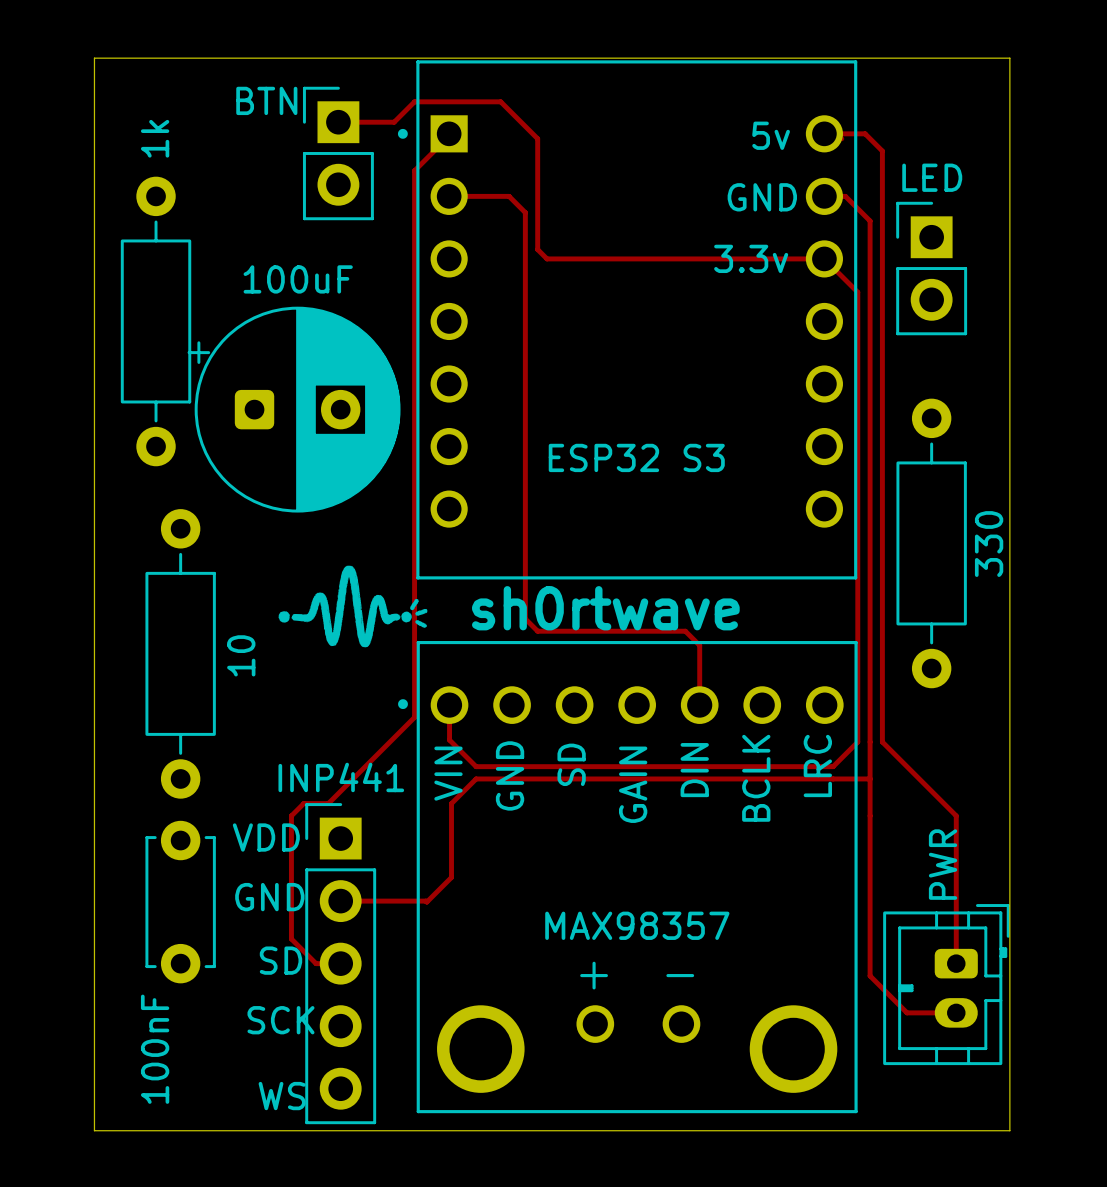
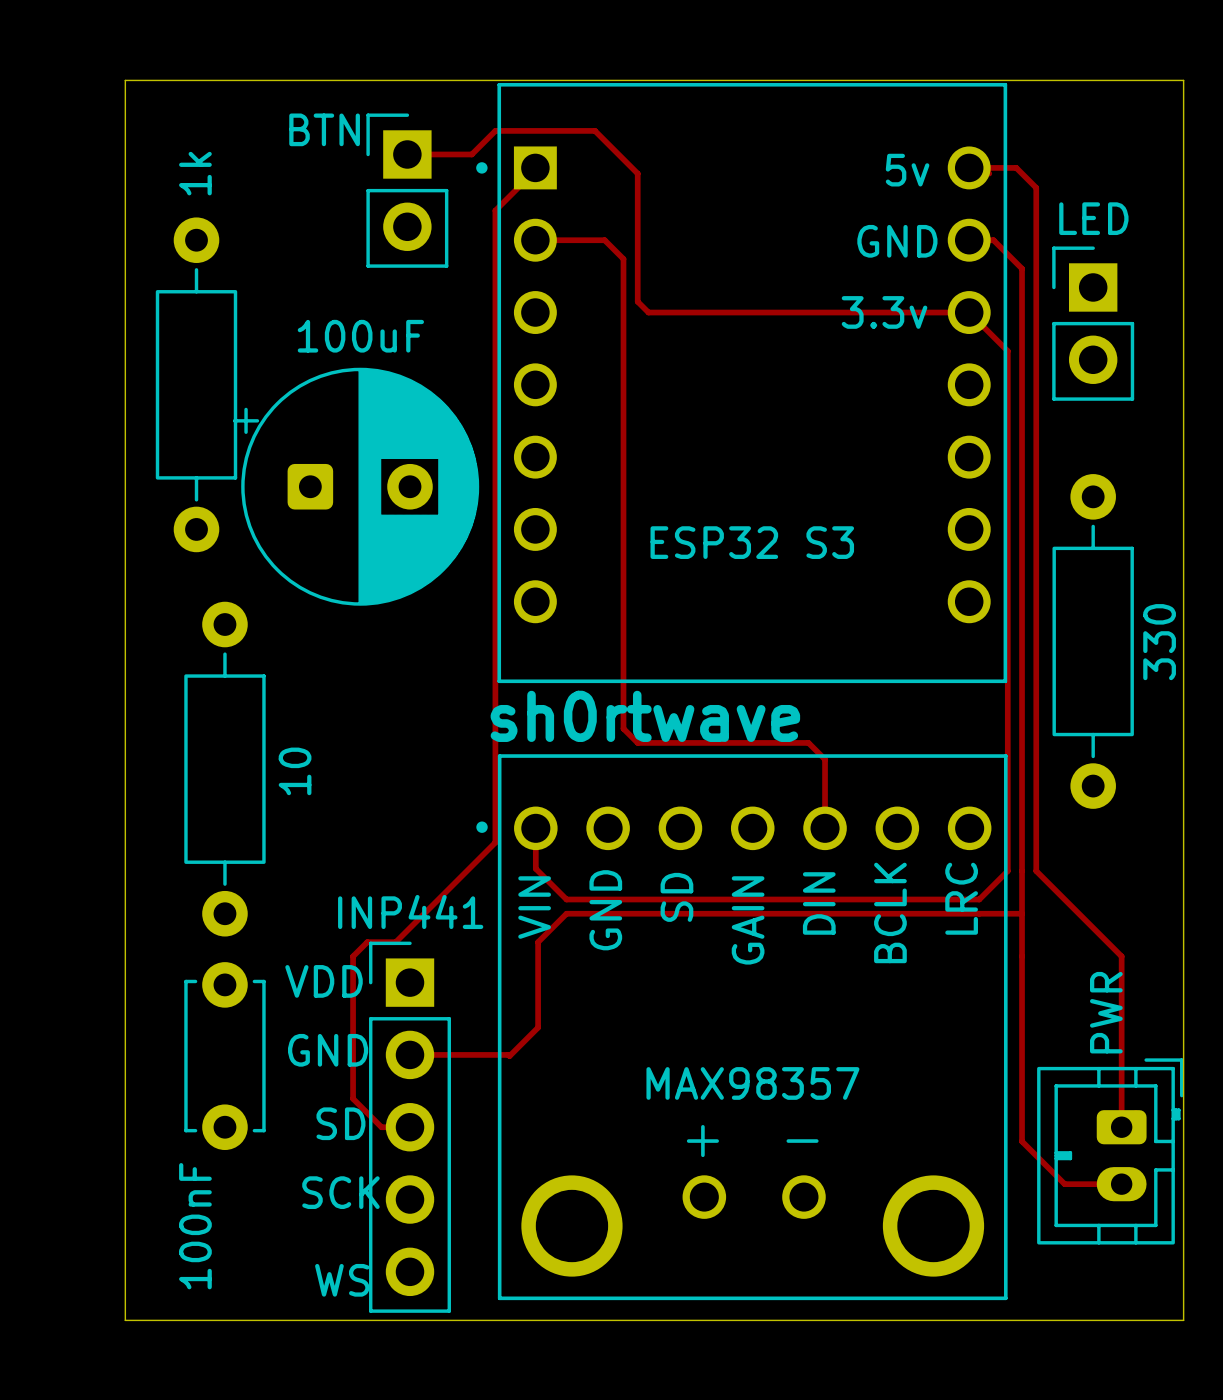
drawing: [278, 565, 428, 648] -> none
text position: sh0rtwave (605, 608) -> sh0rtwave (645, 716)

